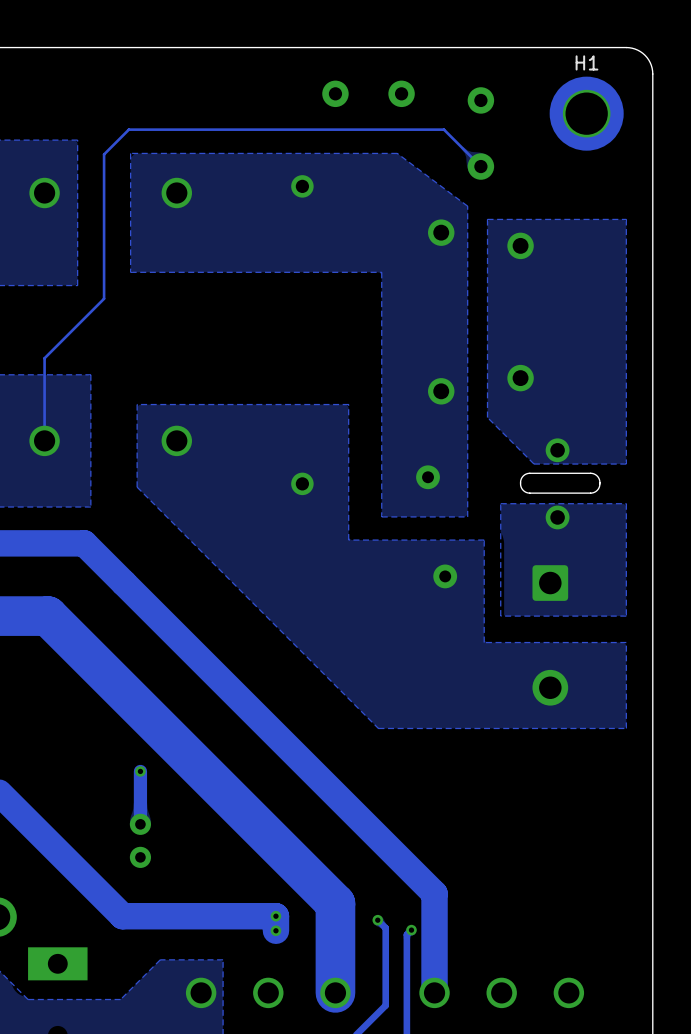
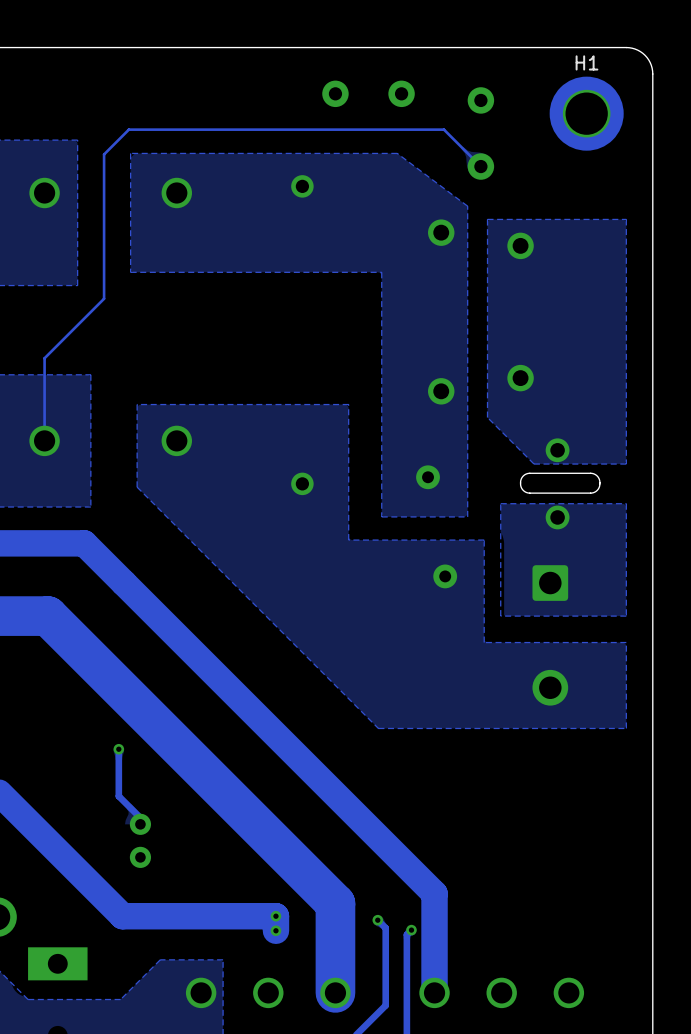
track: (140, 771) (140, 817) -> (118, 749) (118, 796) (140, 817)
via position: (140, 771) -> (118, 749)

